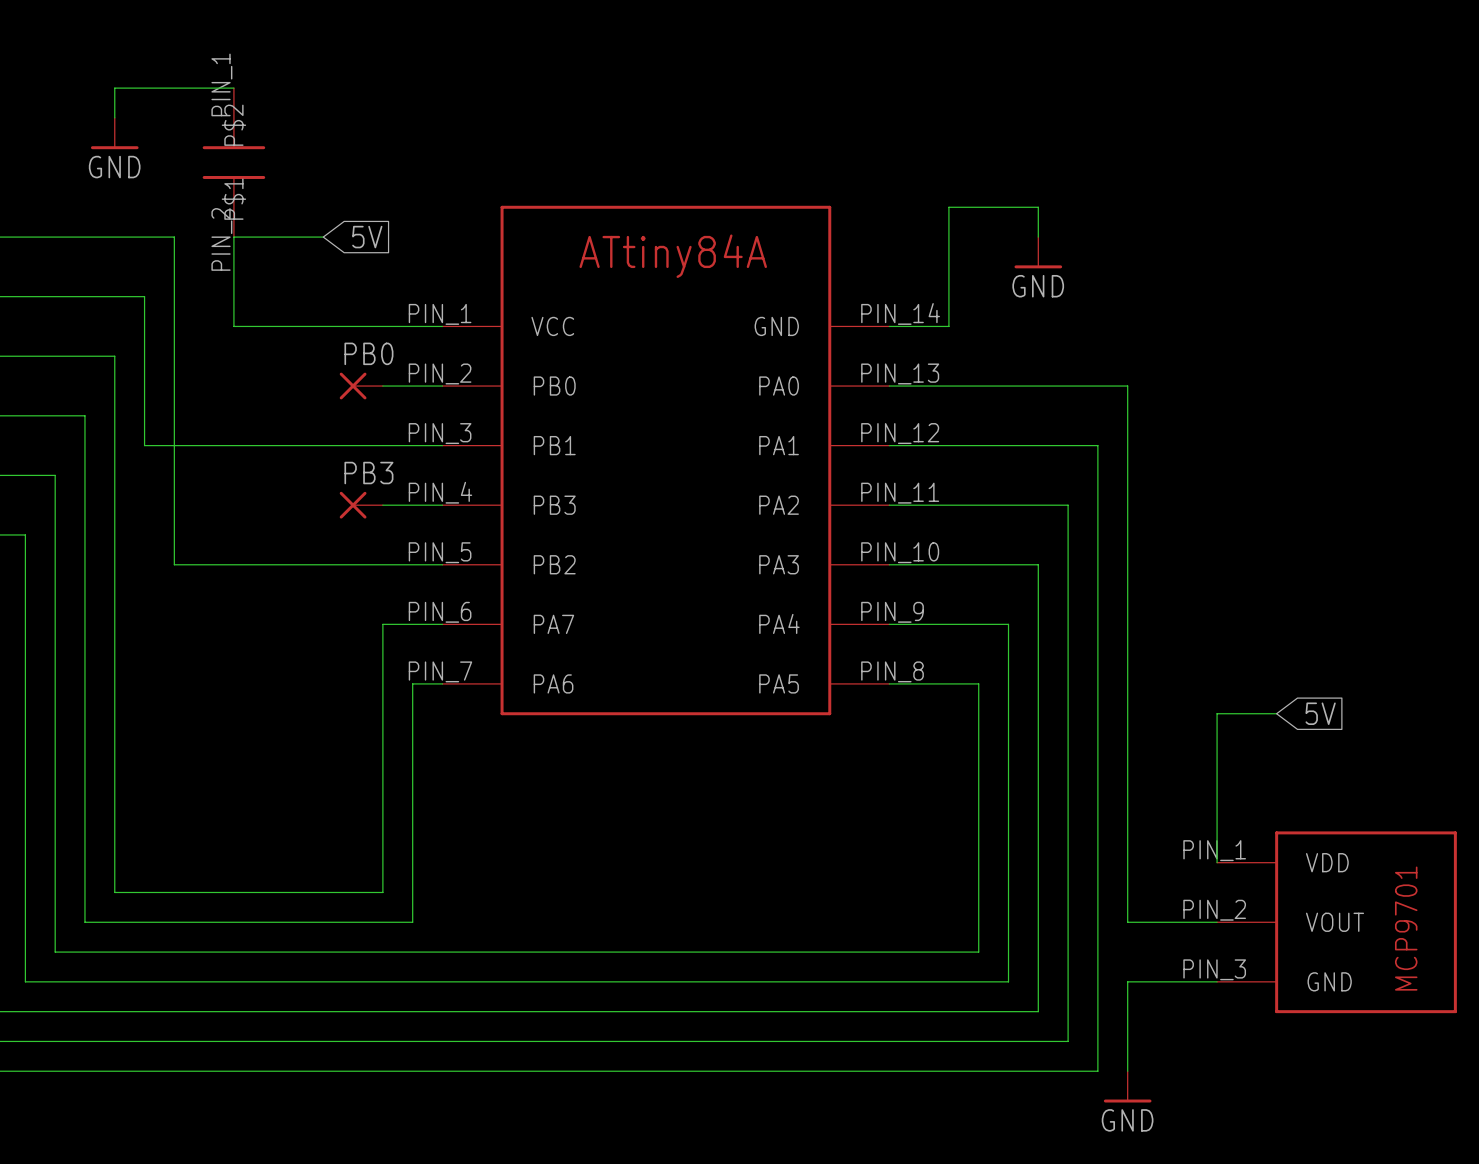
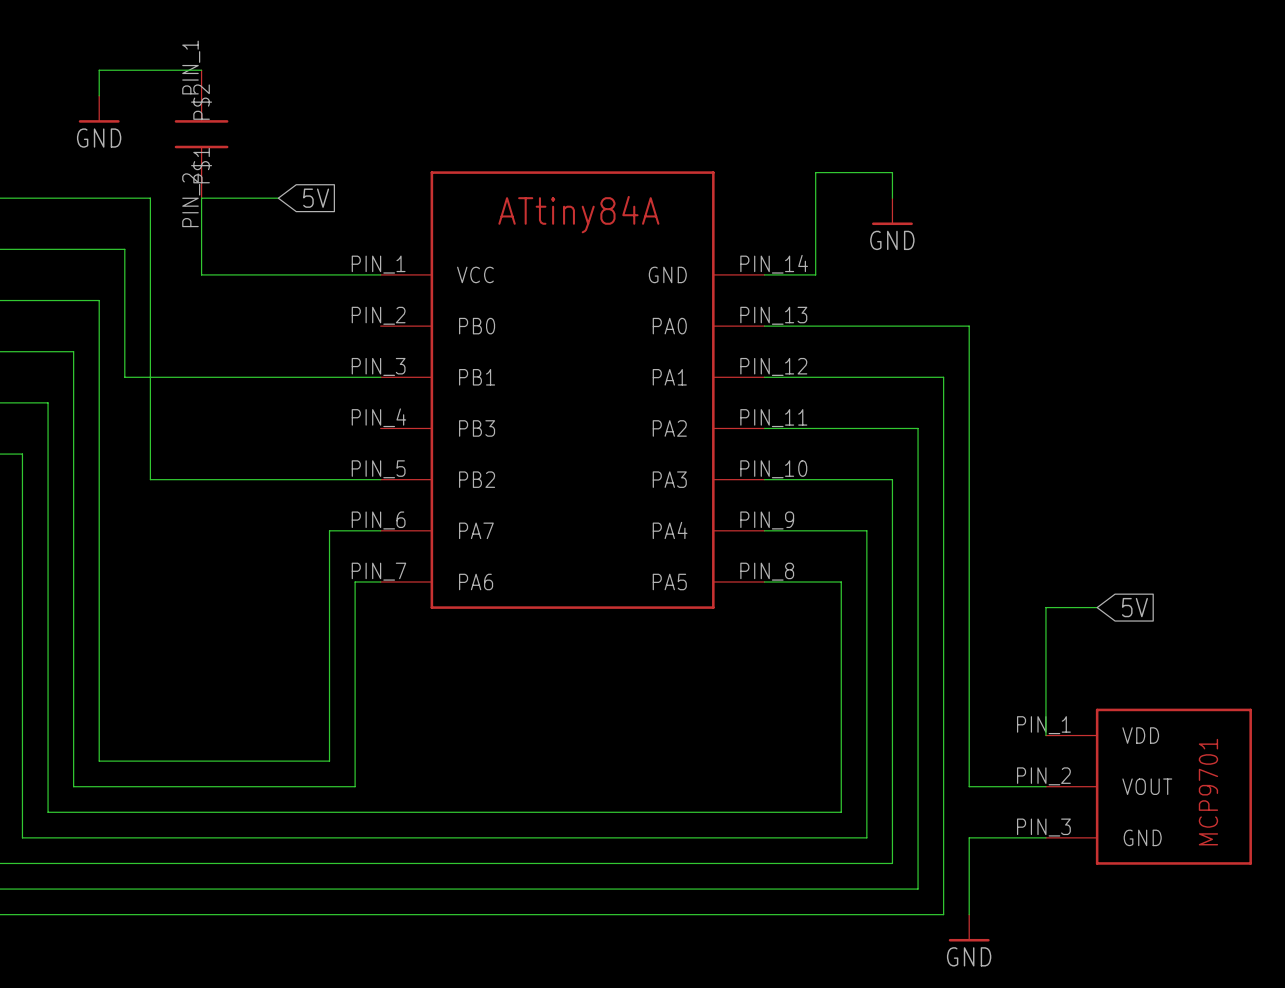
PB0: (361, 386) -> none
wire: (382, 386) (442, 386) -> none
PB3: (361, 505) -> none
wire: (382, 505) (442, 505) -> none

